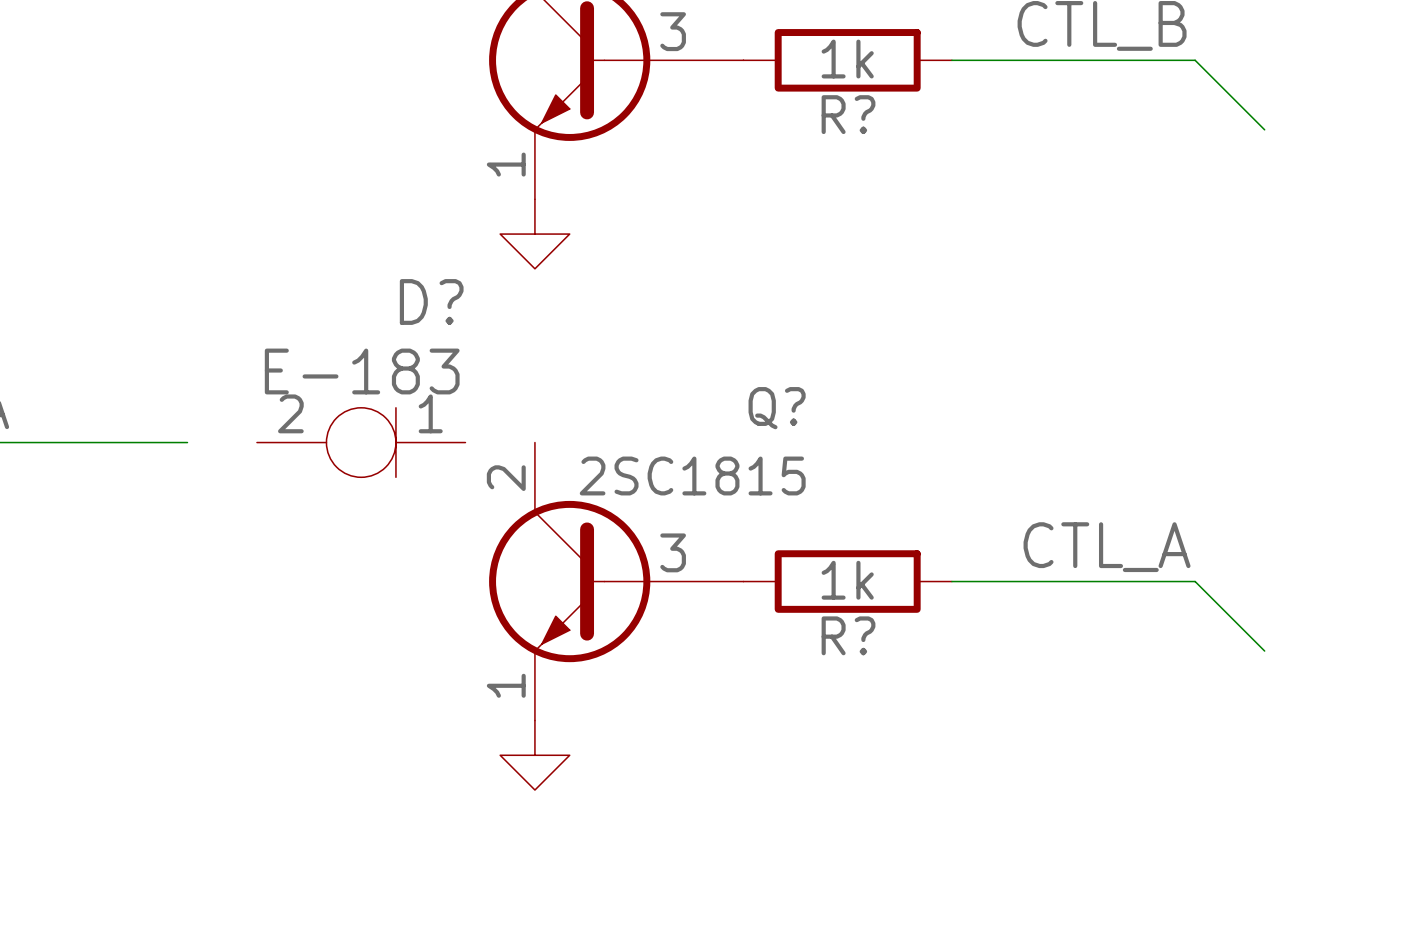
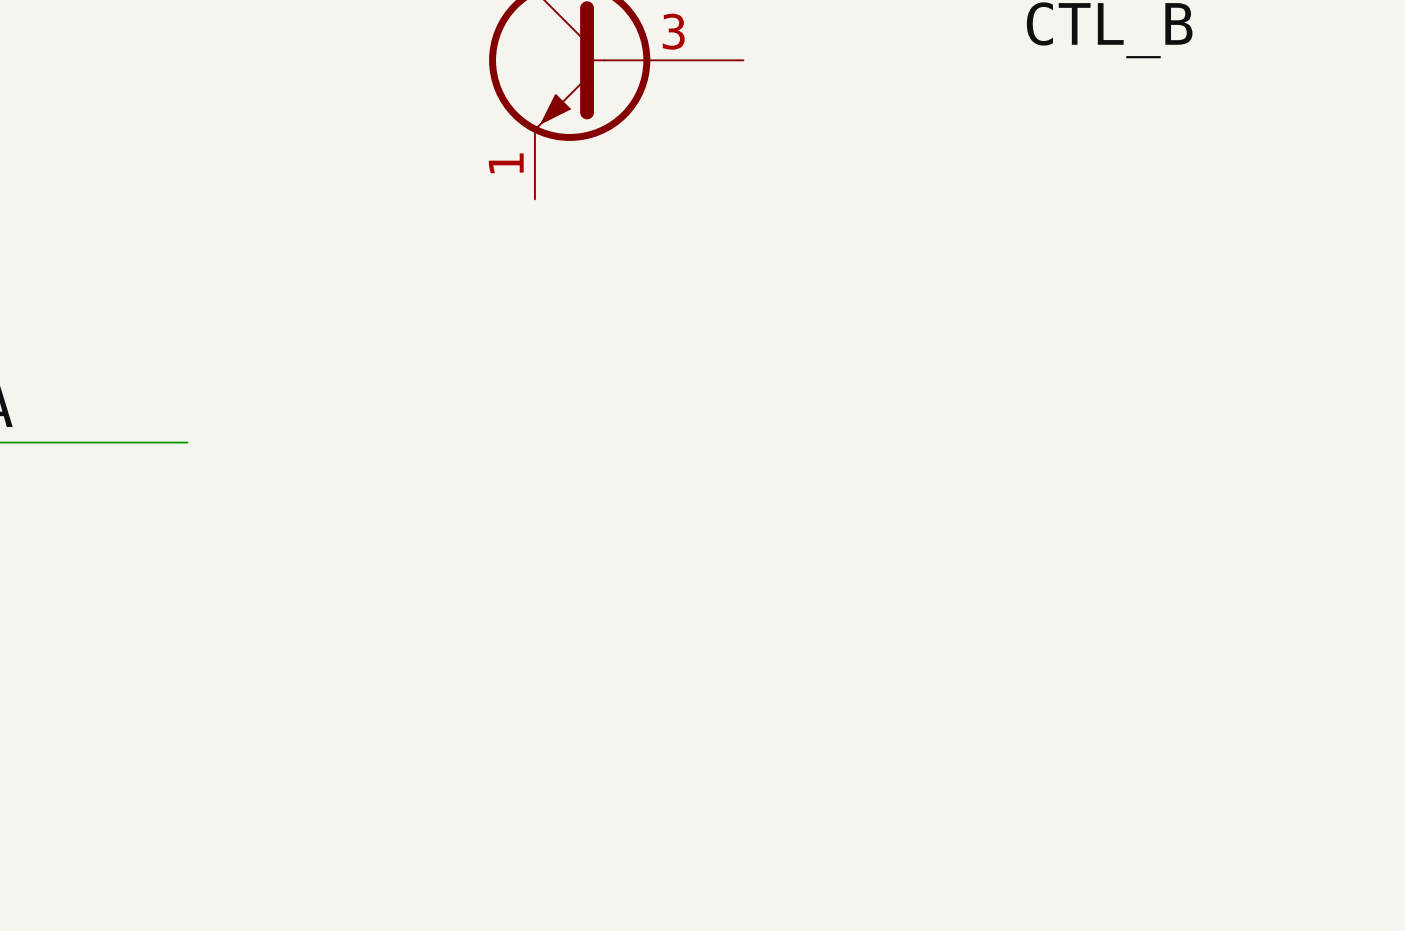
R?: 1k (847, 60) -> none
wire: (951, 60) (1195, 60) (1264, 129) -> none
power symbol: (534, 234) -> none
D?: E-183 (361, 442) -> none
label: CTL_A (1107, 547) -> none
Q?: 2SC1815 (616, 581) -> none
R?: 1k (847, 581) -> none
wire: (951, 581) (1195, 581) (1264, 651) -> none
power symbol: (534, 755) -> none

